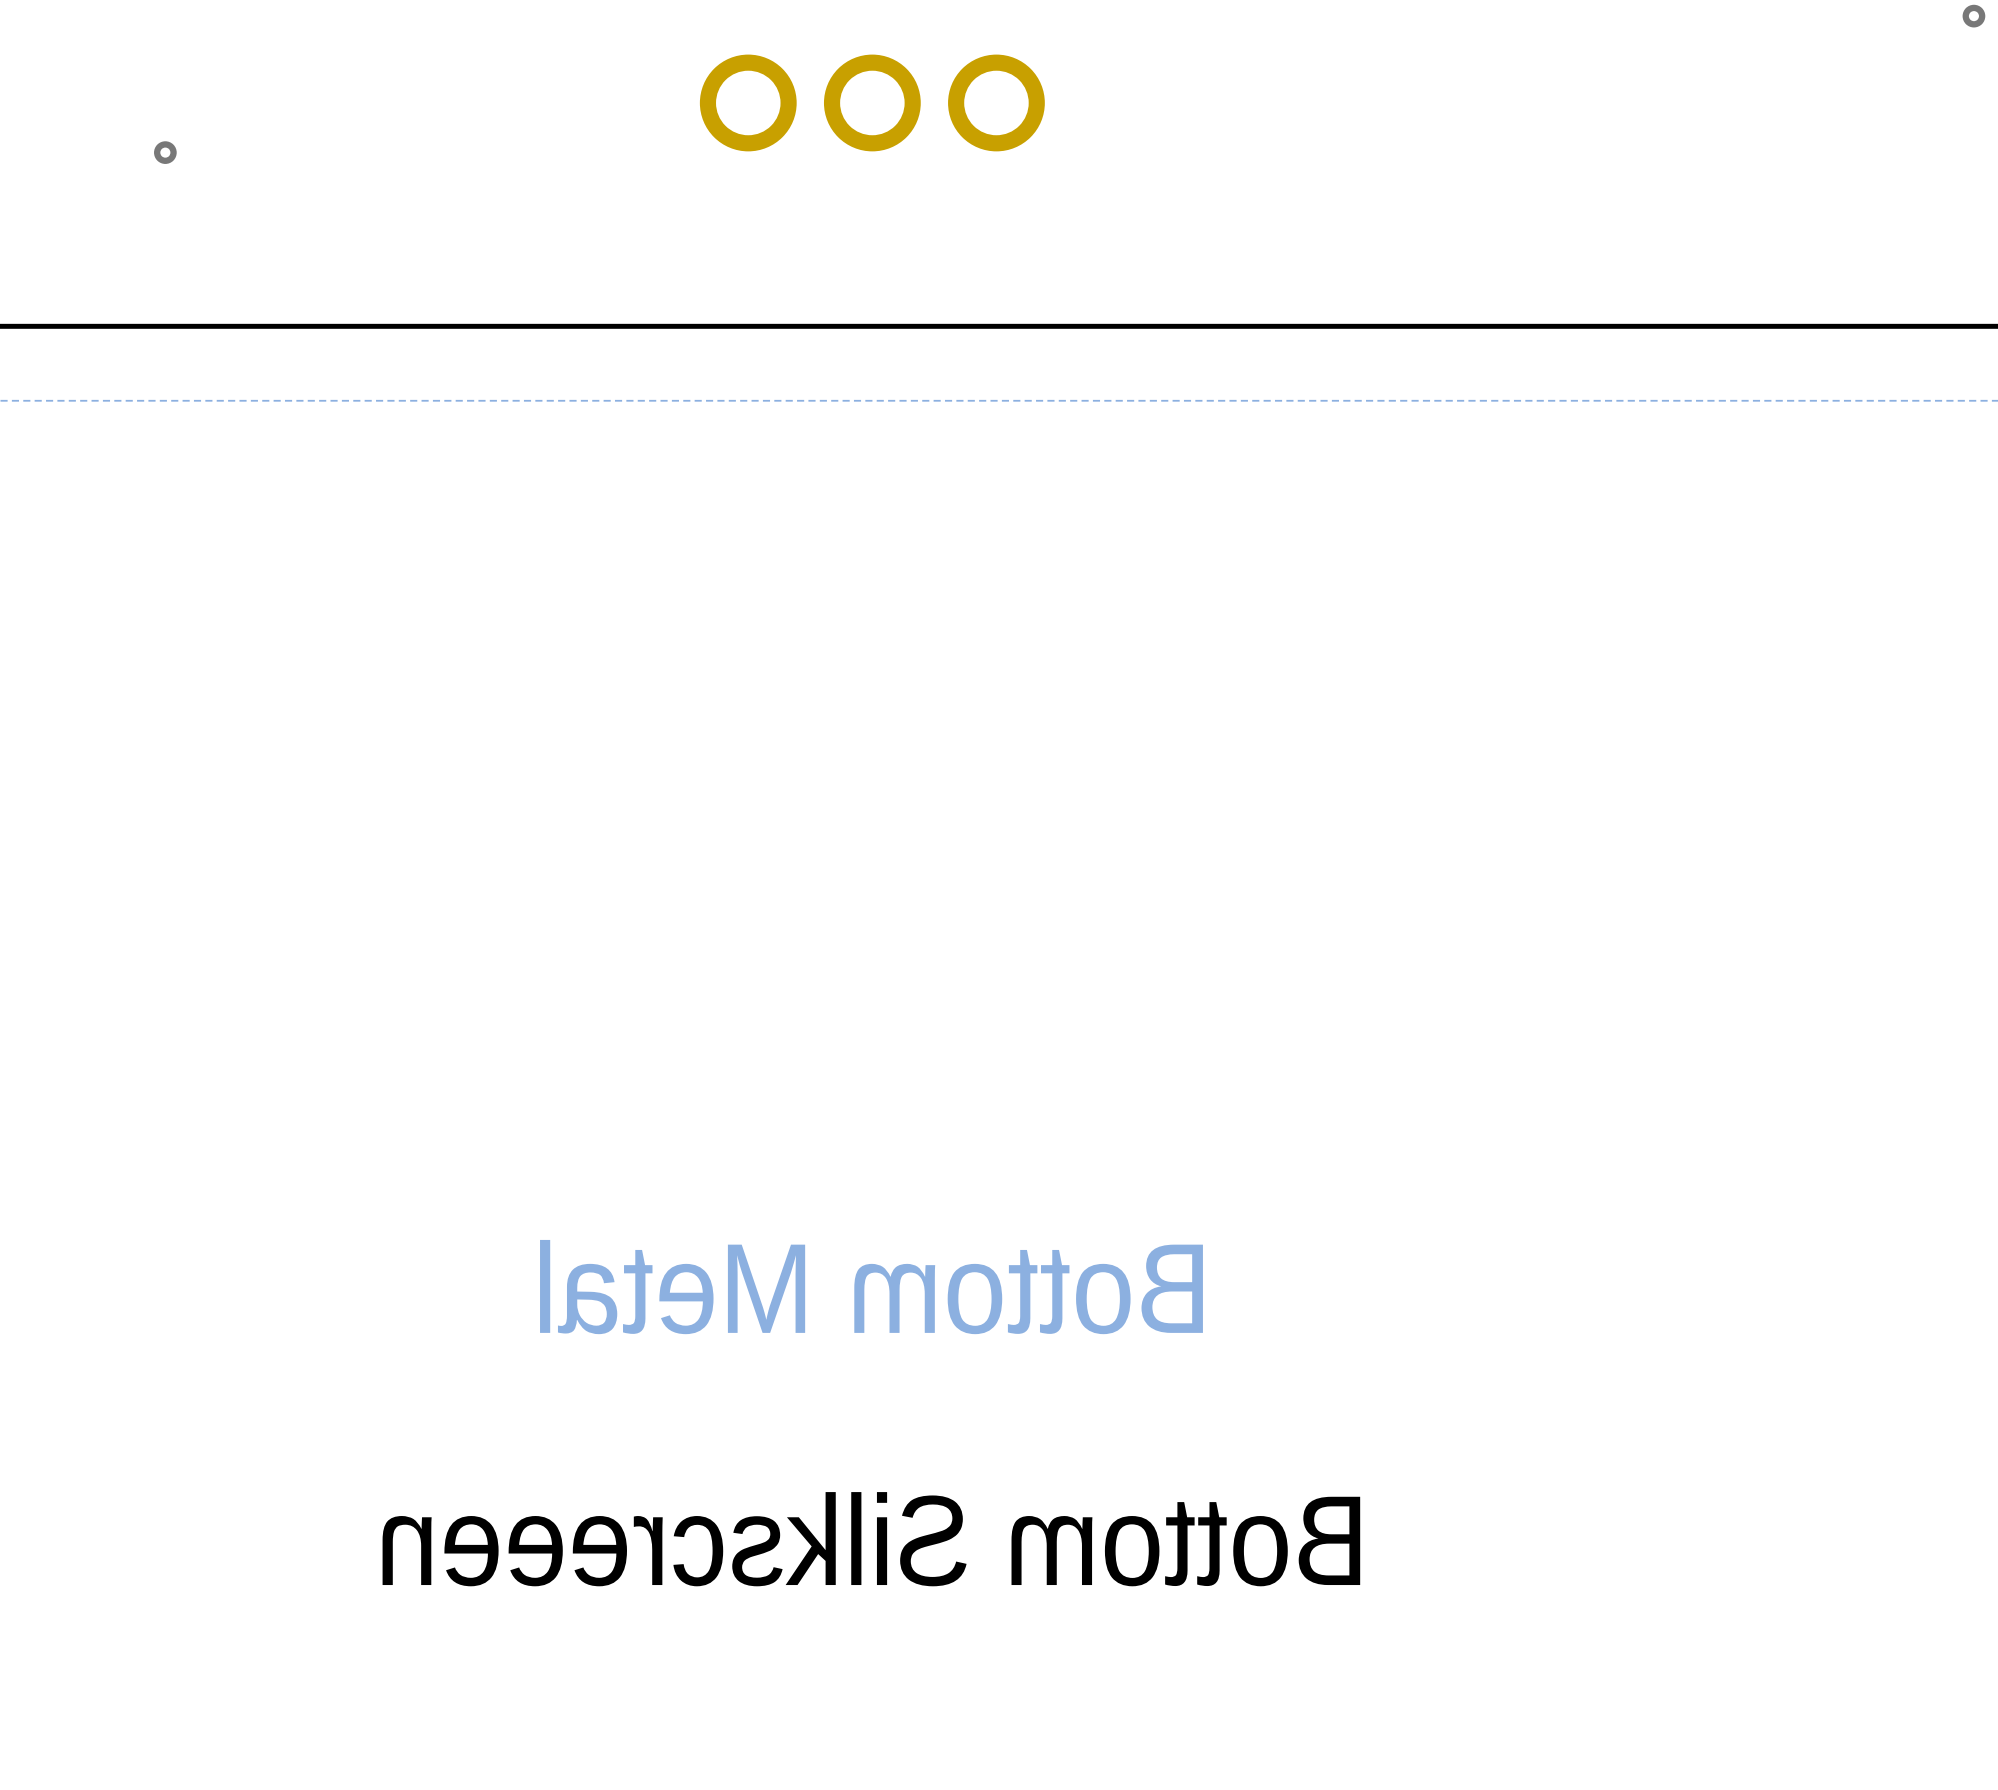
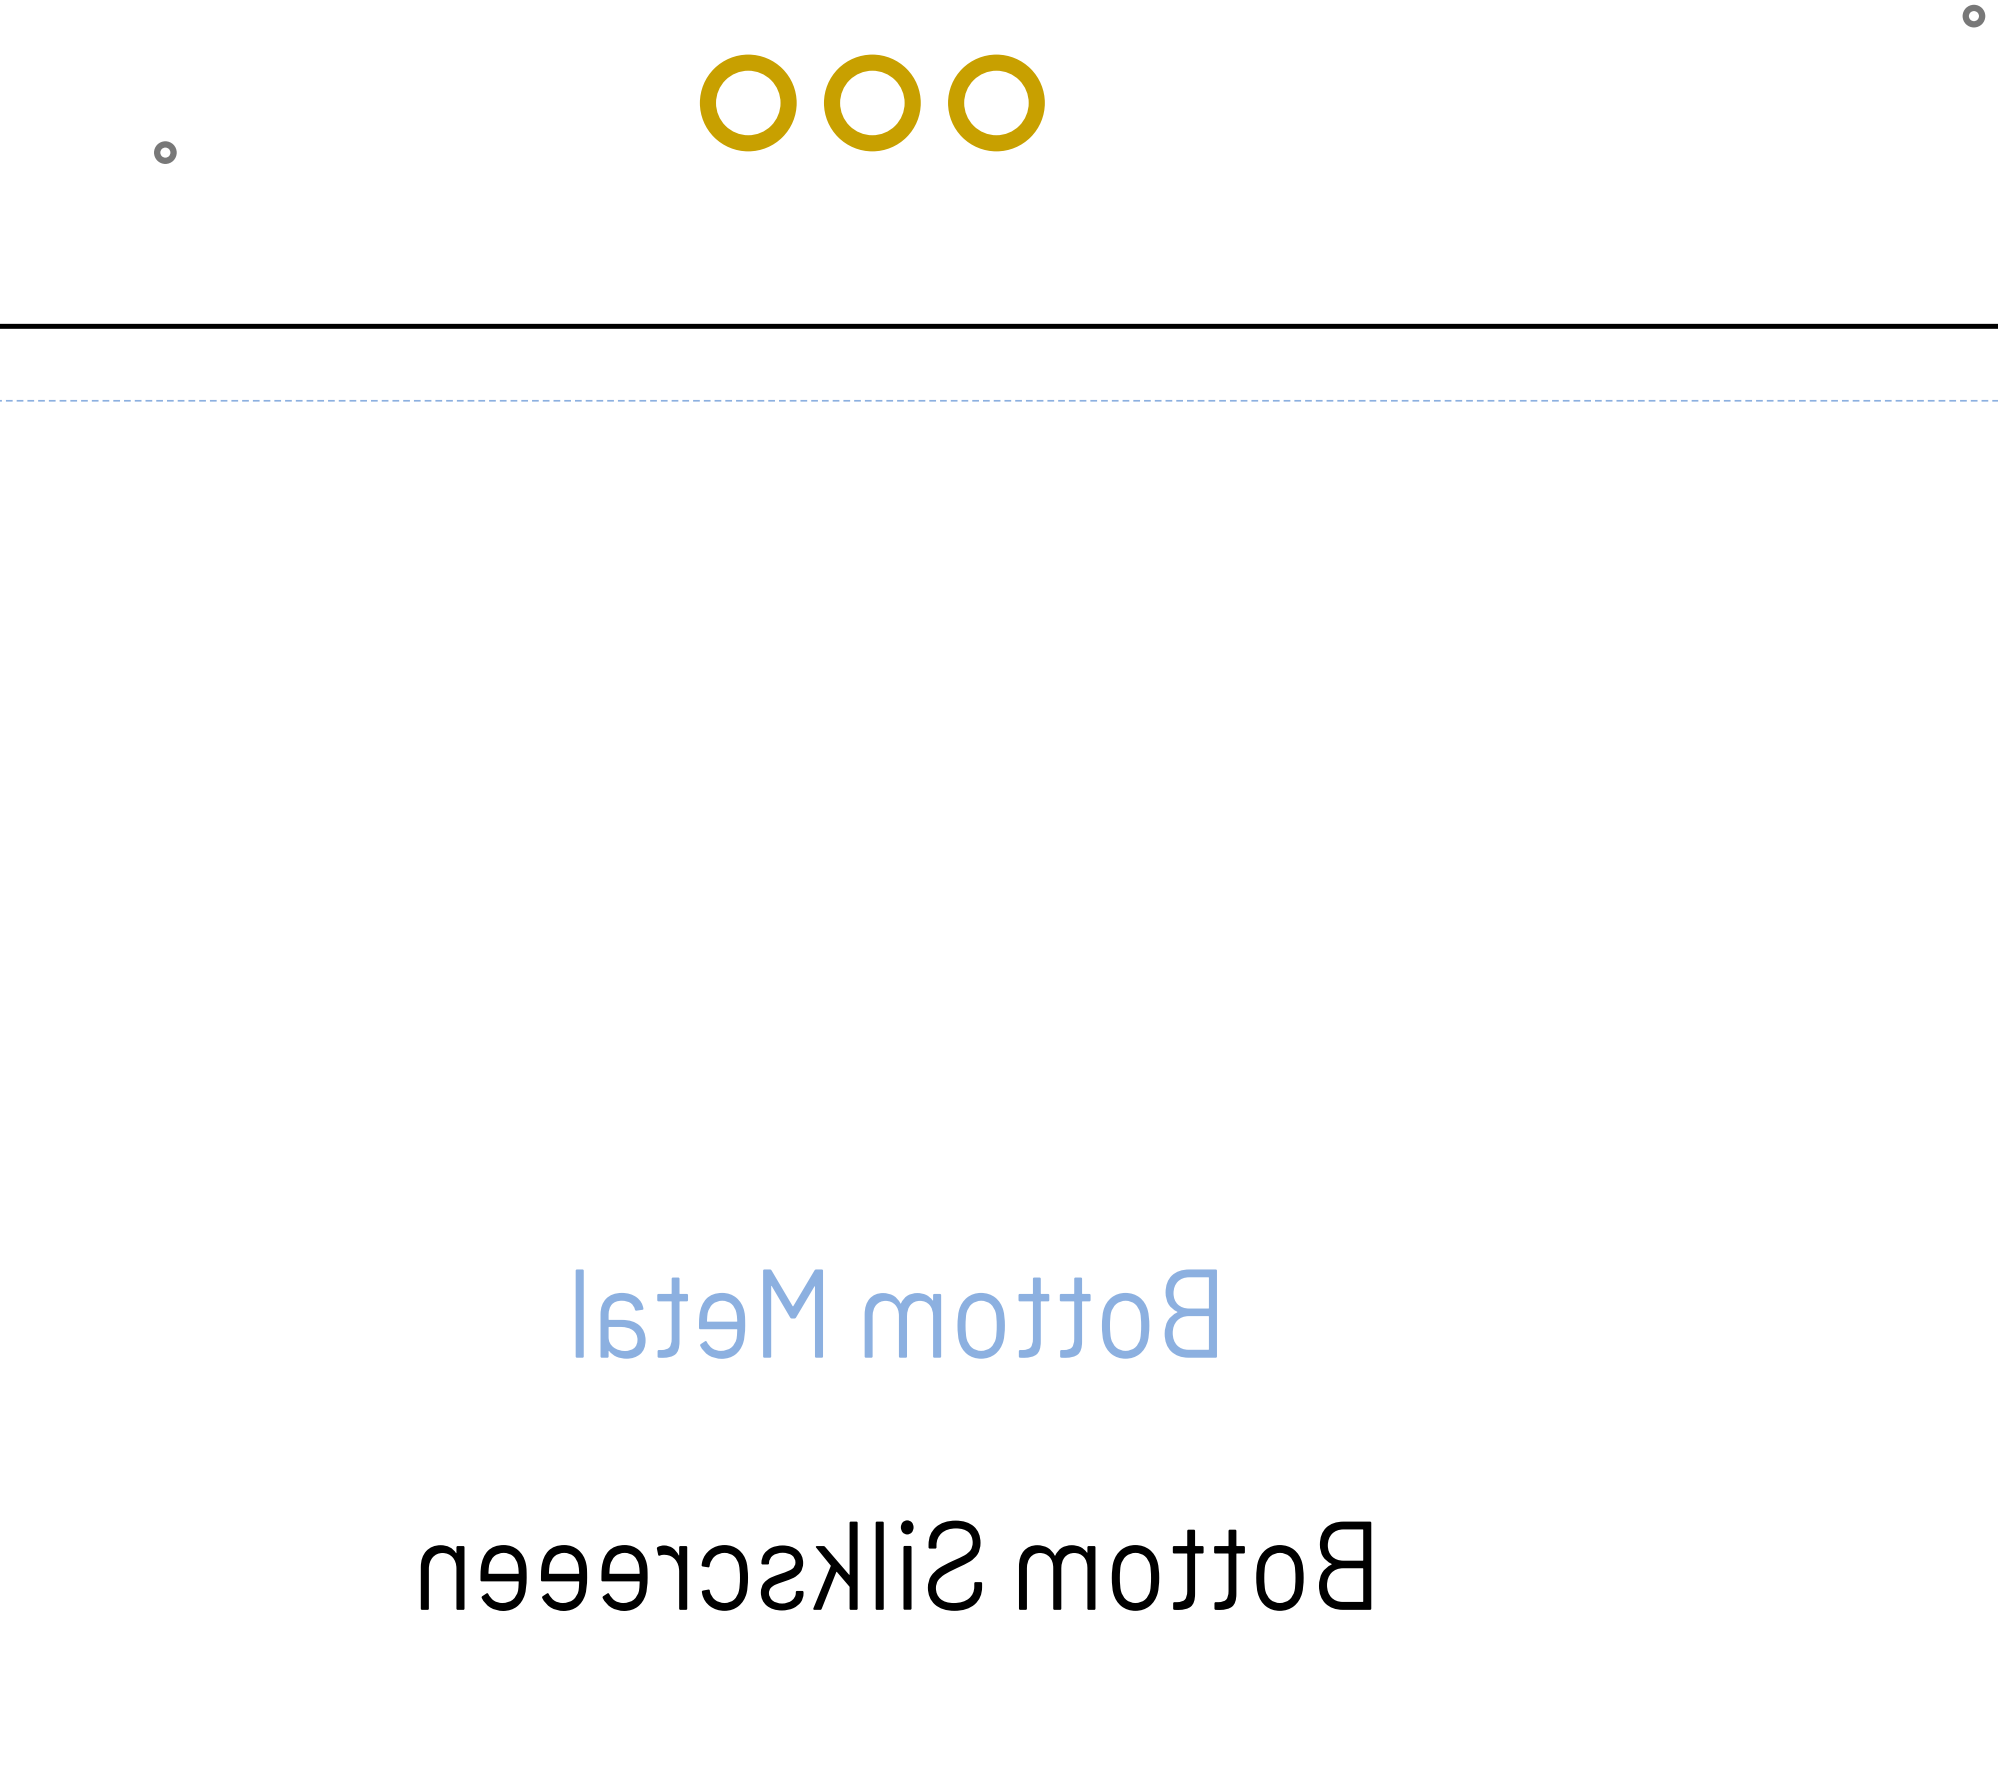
drawing position: (871, 1413) -> (896, 1440)

